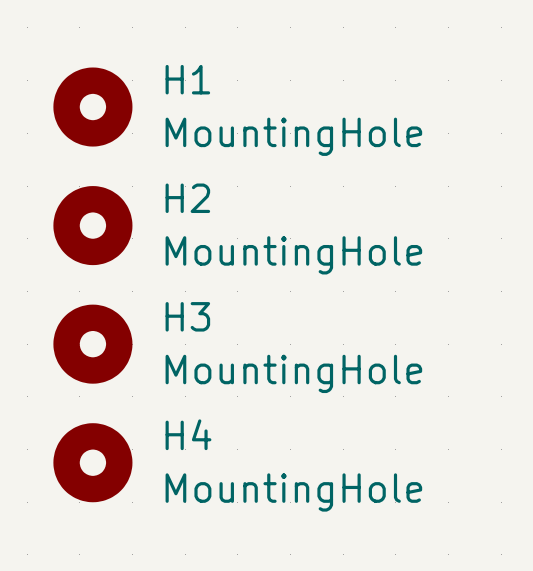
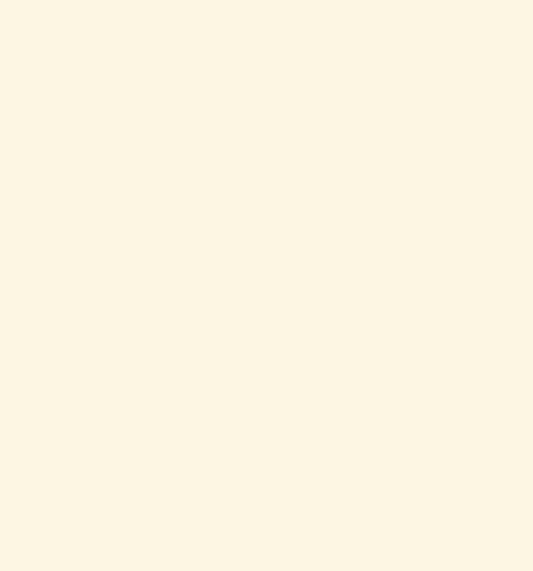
H1: MountingHole (92, 107) -> none
H2: MountingHole (92, 225) -> none
H3: MountingHole (92, 344) -> none
H4: MountingHole (92, 462) -> none

